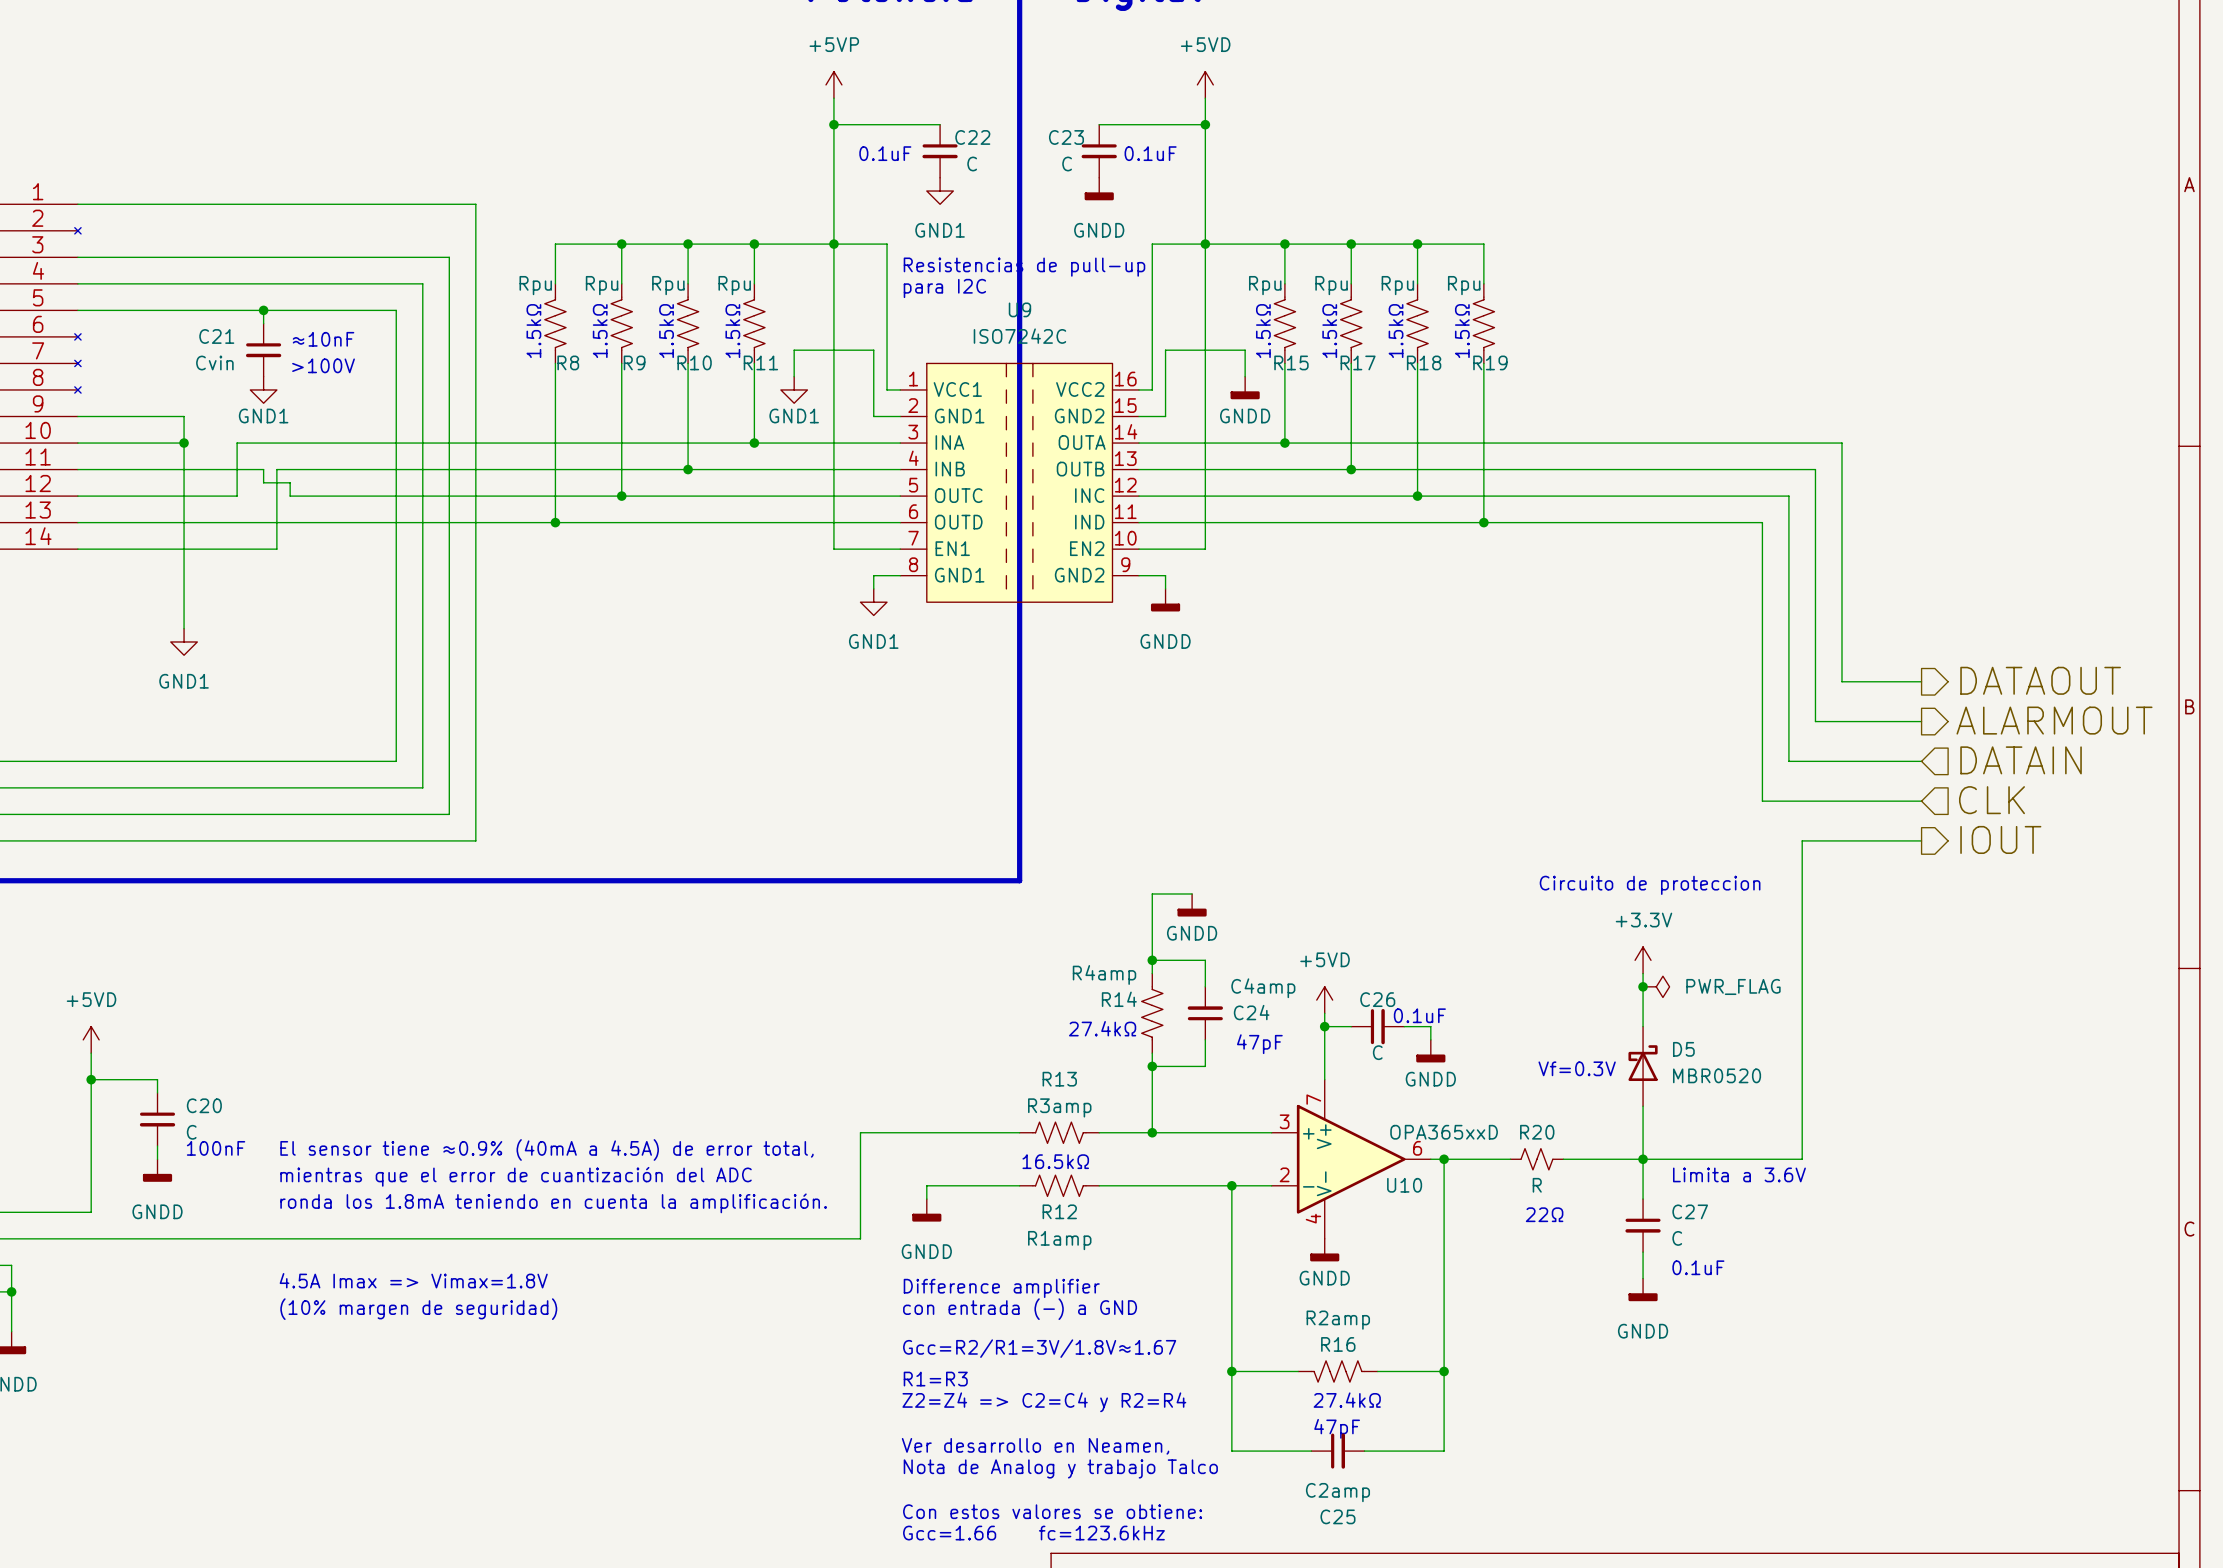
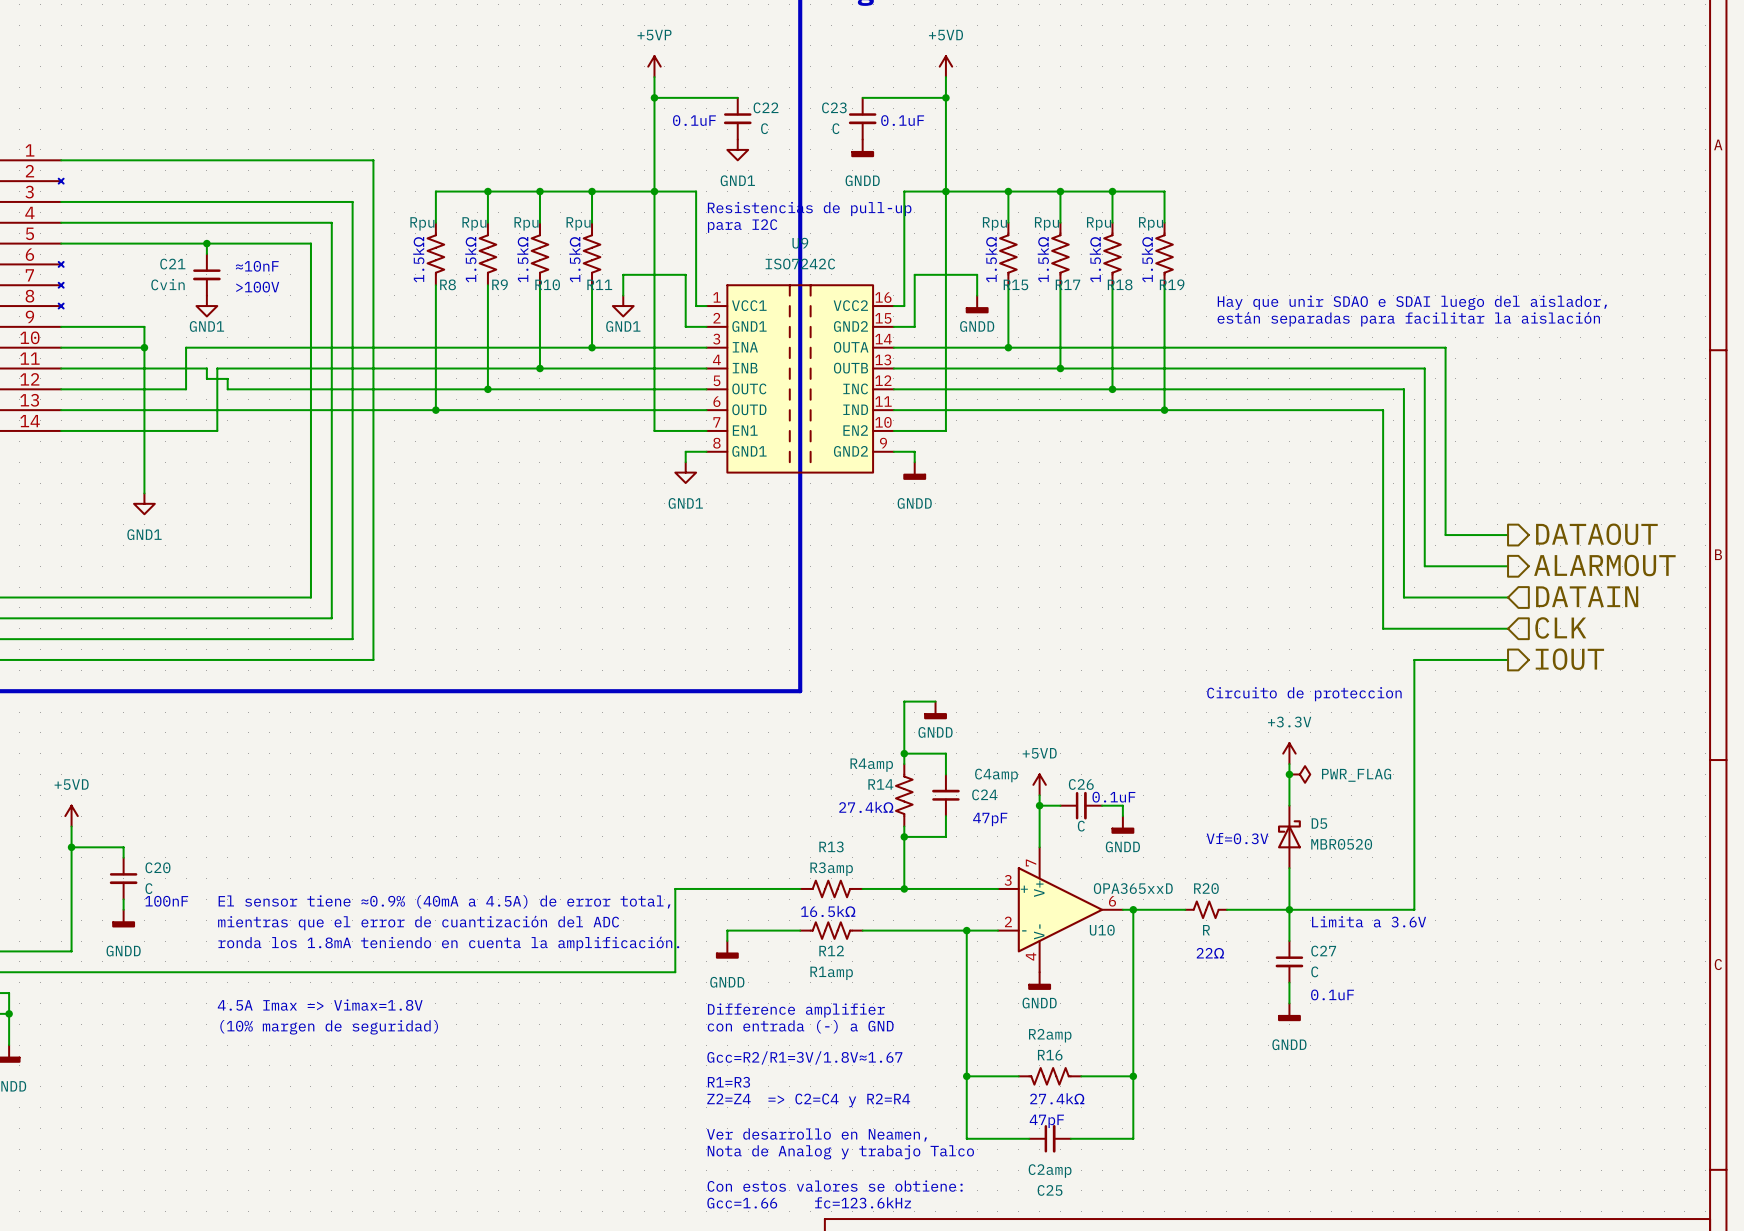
text: none -> Hay que unir SDAO e SDAI luego del aislador, (1412, 302)
text: none -> están separadas para facilitar la aislación (1408, 319)

